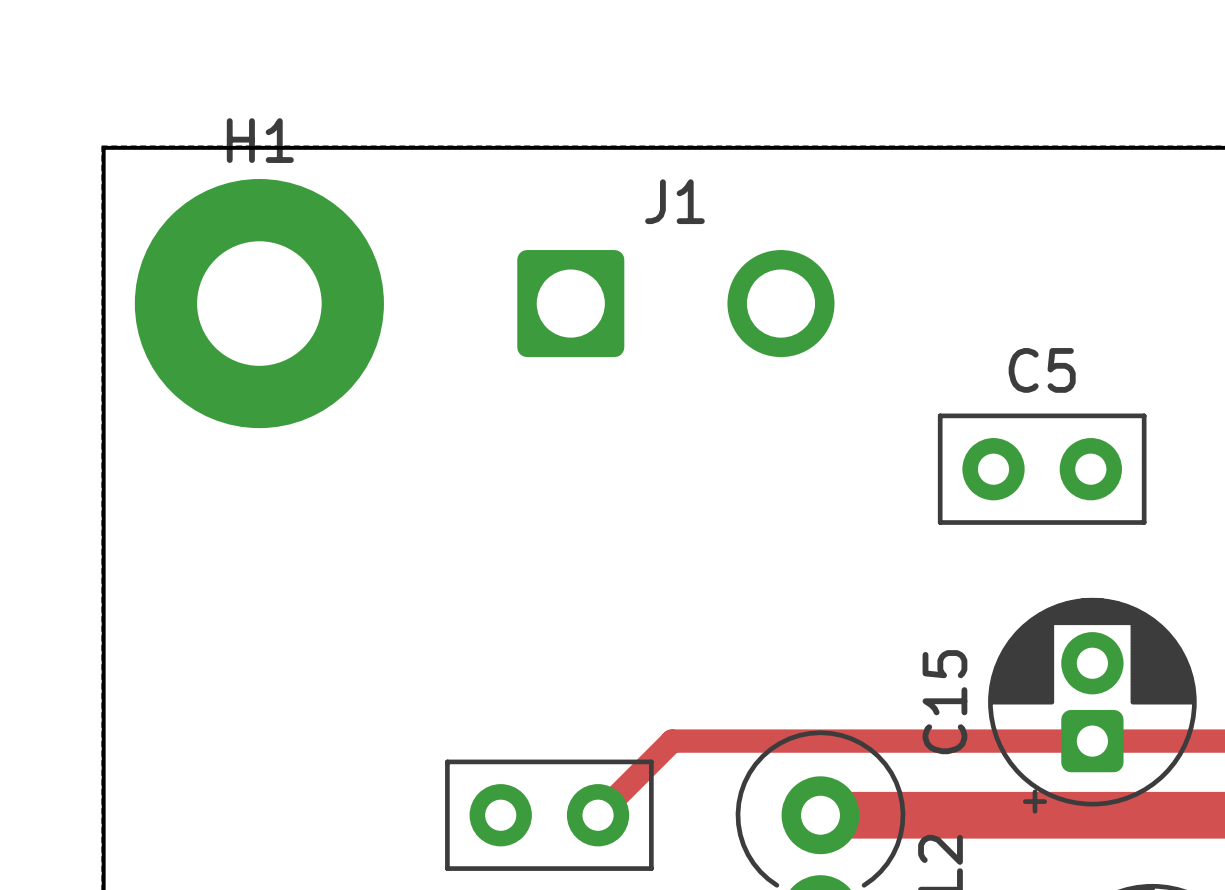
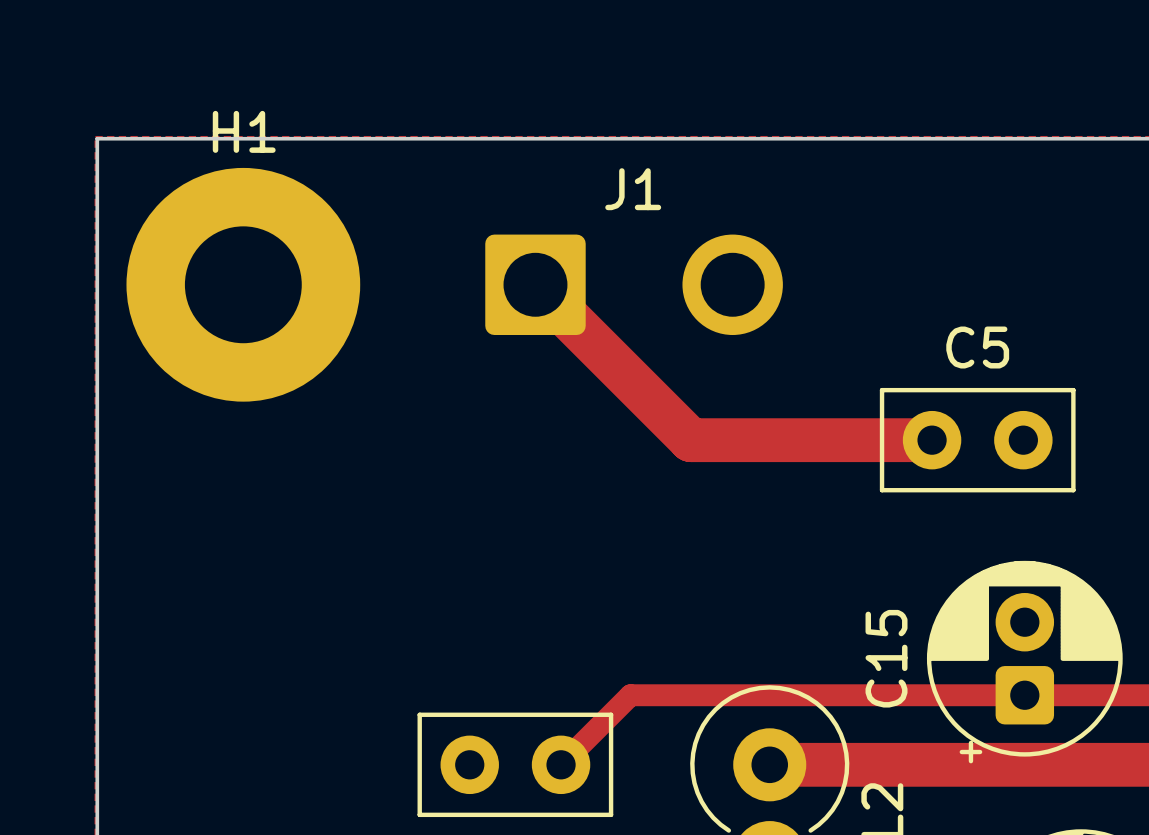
track: none -> (535, 284) (690, 440) (932, 440)

